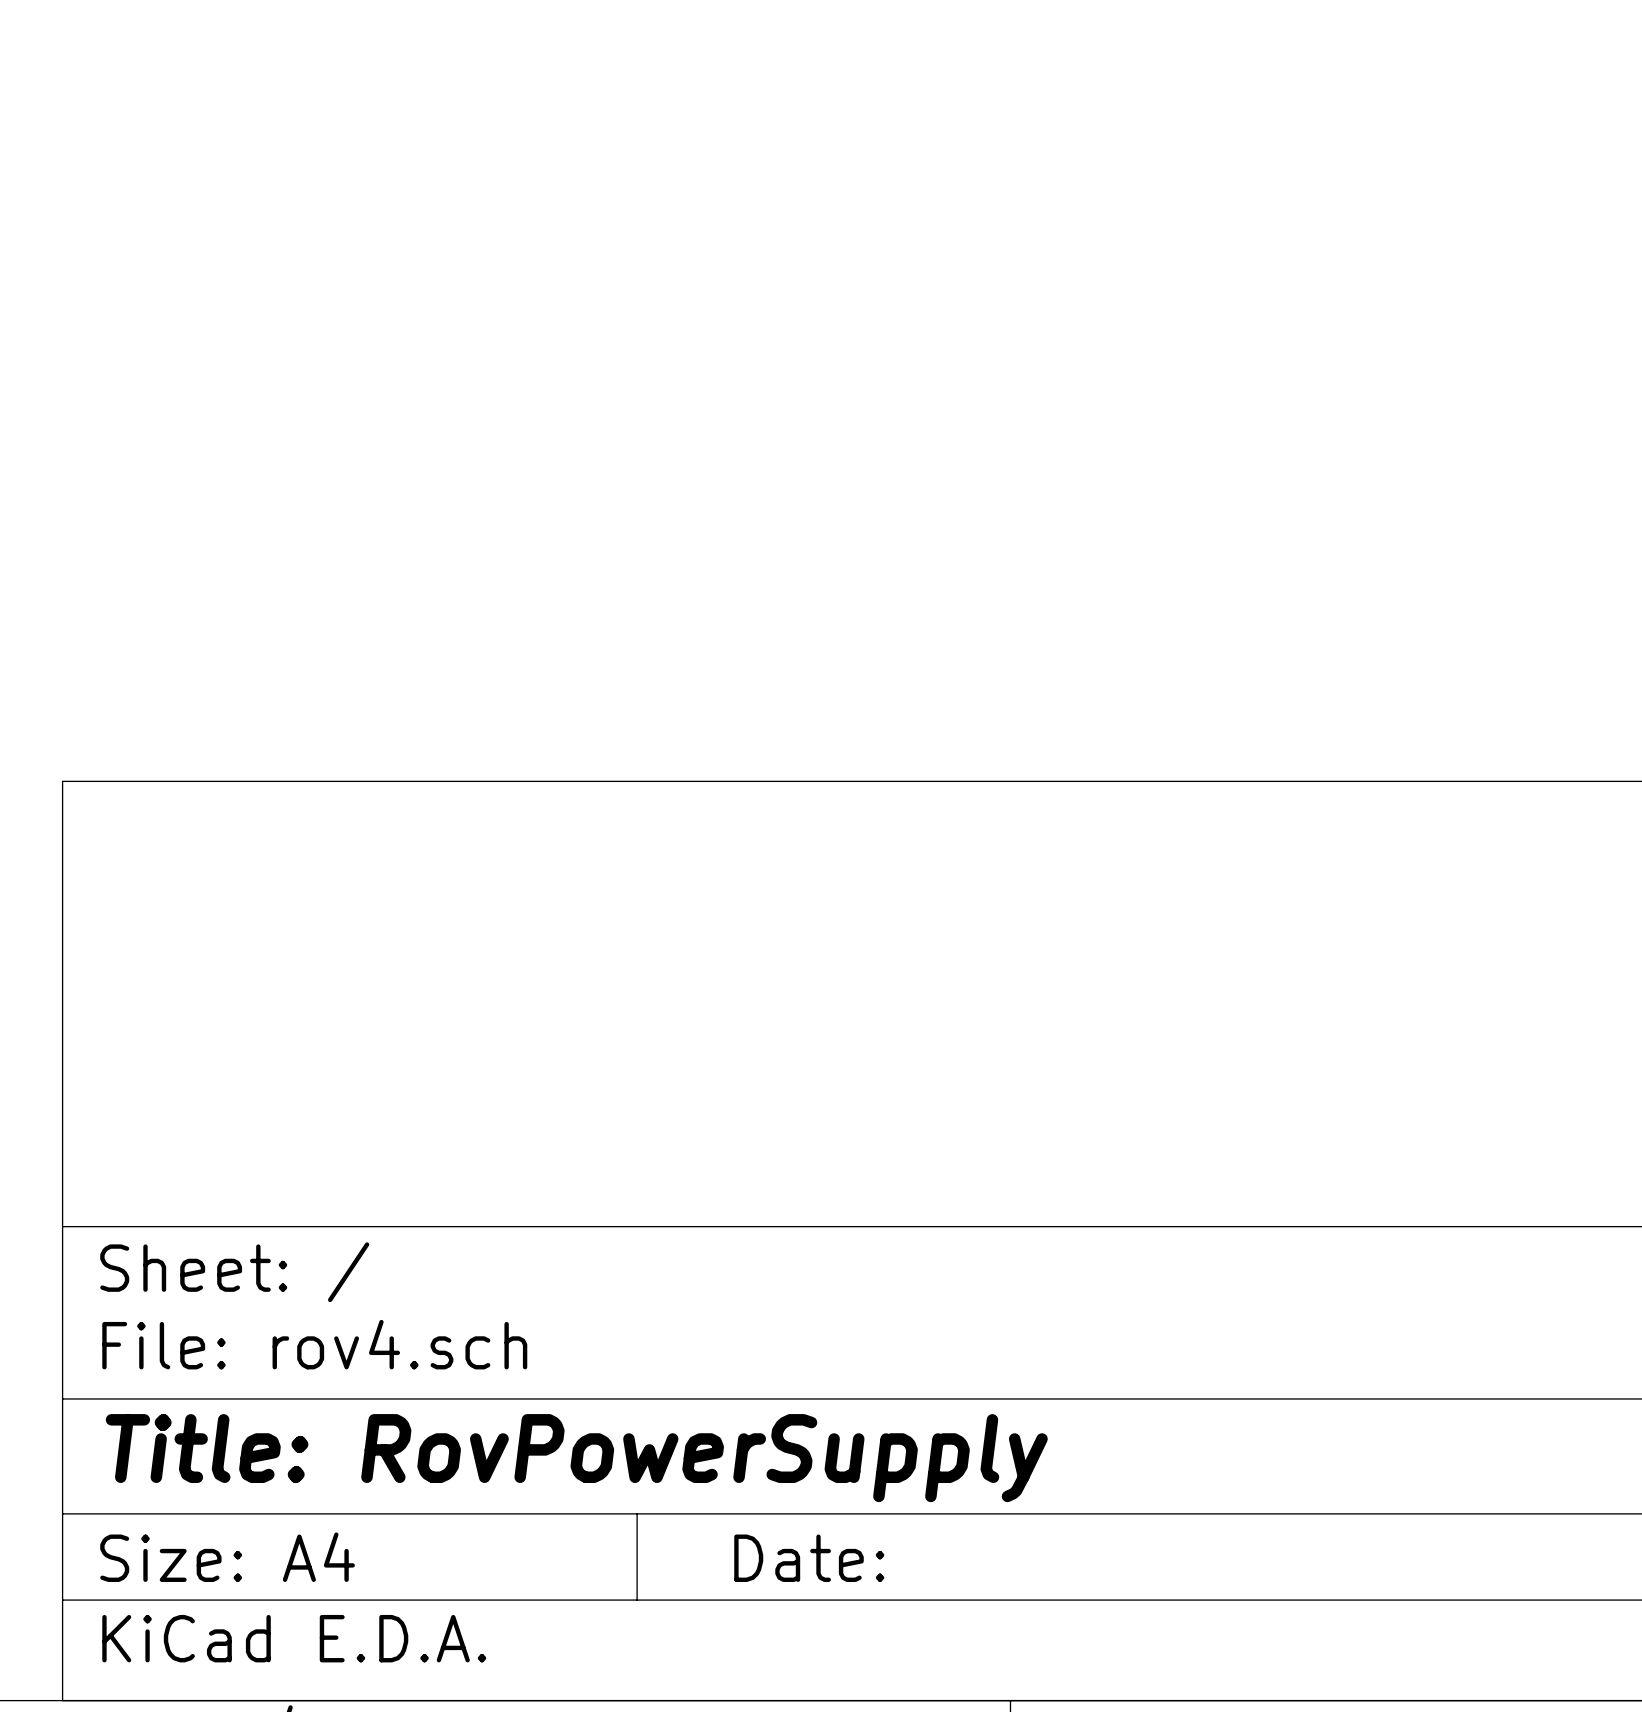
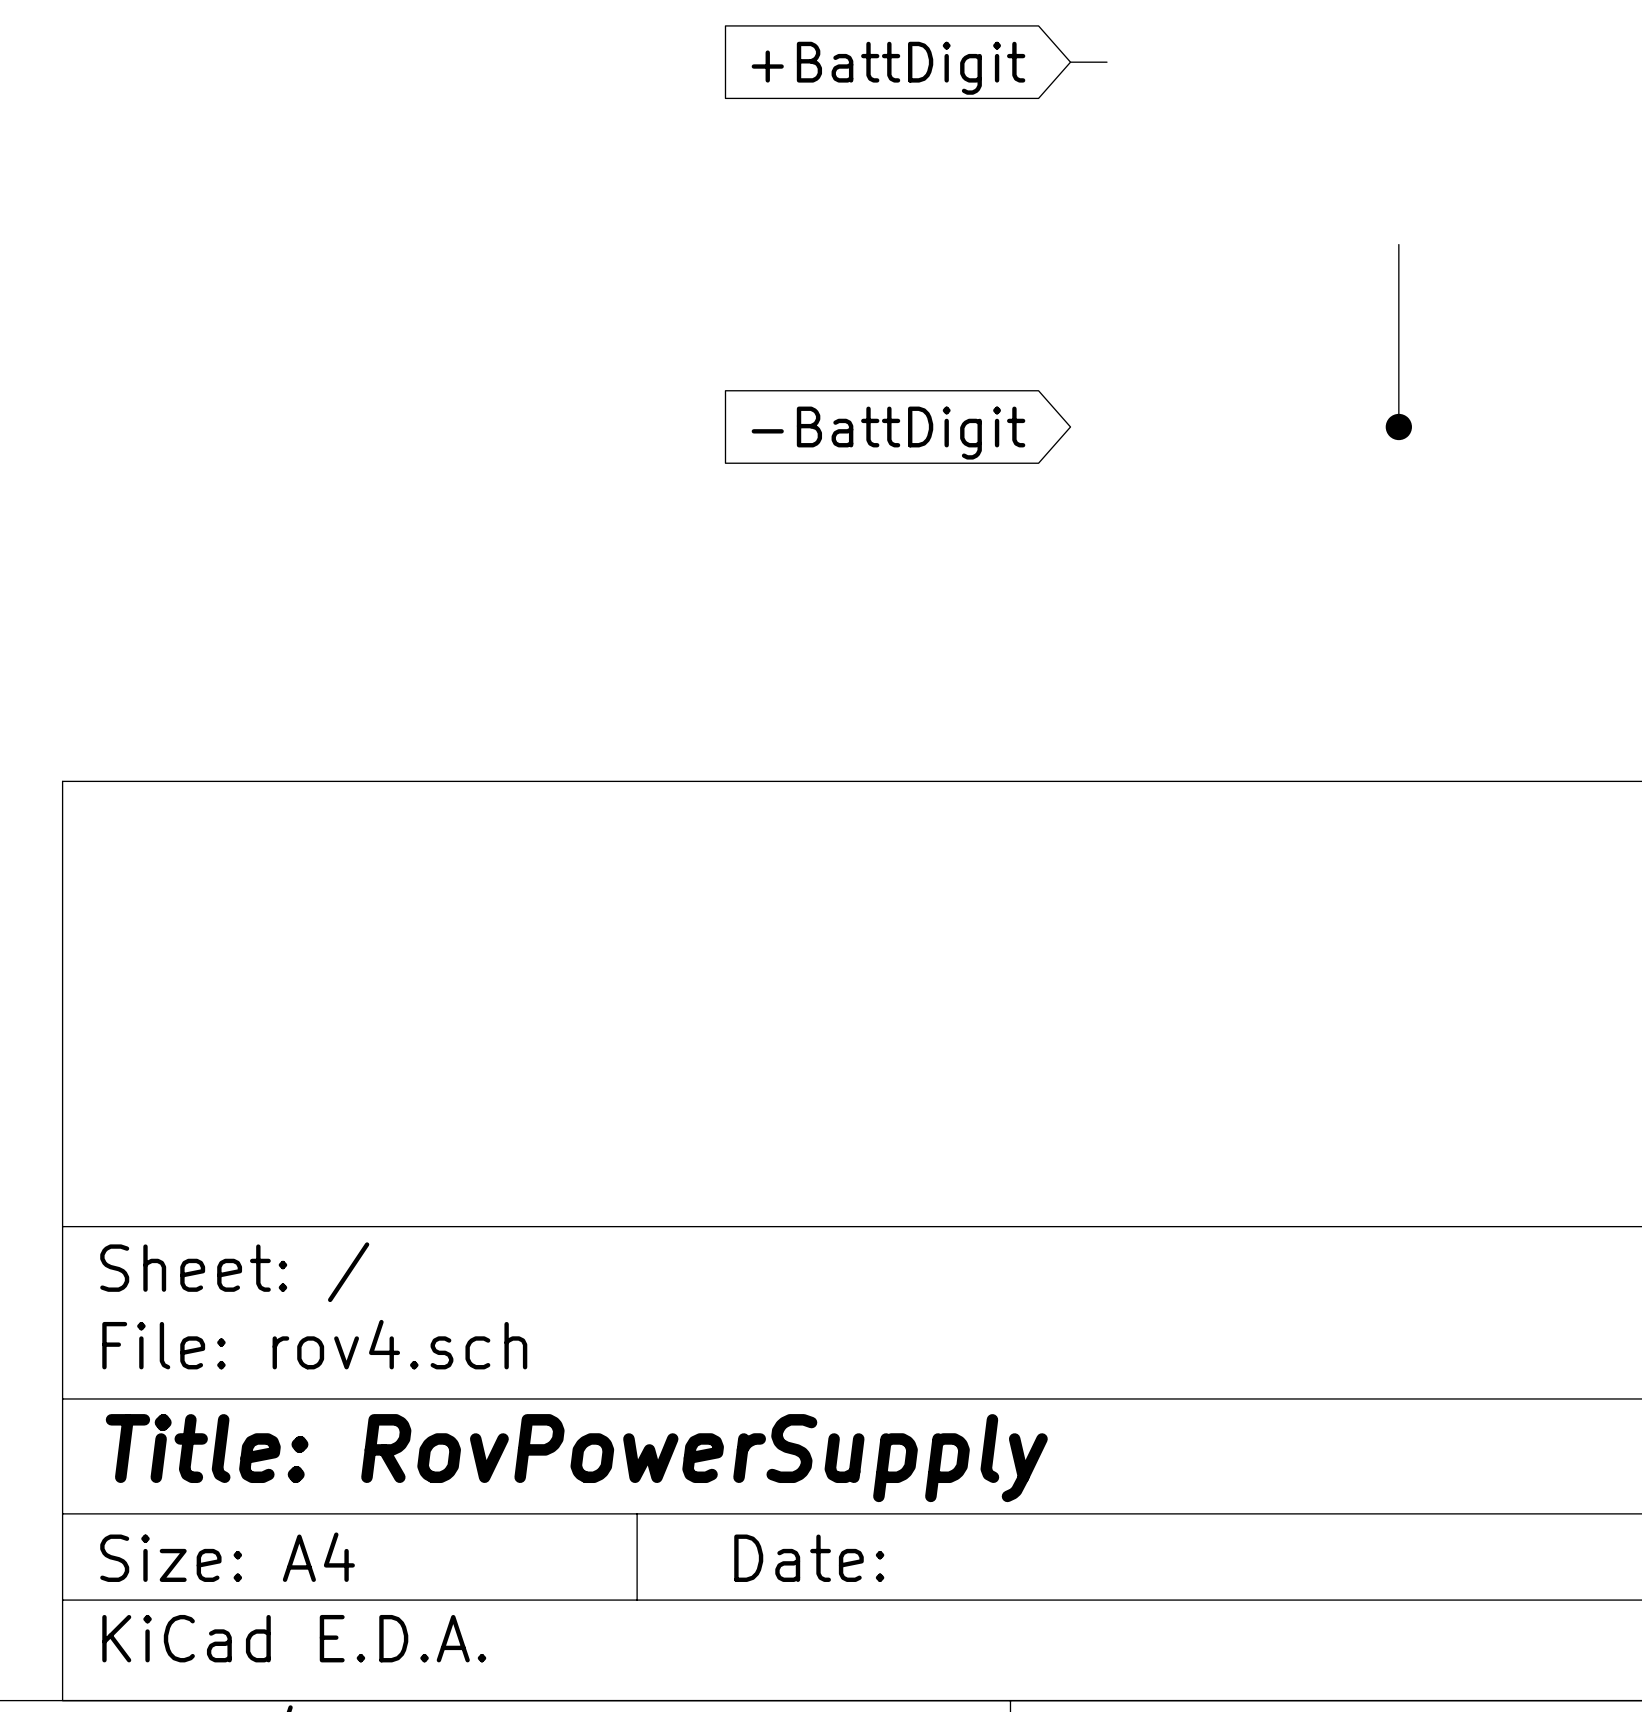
wire: none -> (1070, 62) (1106, 62)
global label: none -> +BattDigit (888, 68)
wire: none -> (1398, 244) (1398, 426)
junction: none -> (1398, 426)
global label: none -> -BattDigit (888, 433)

